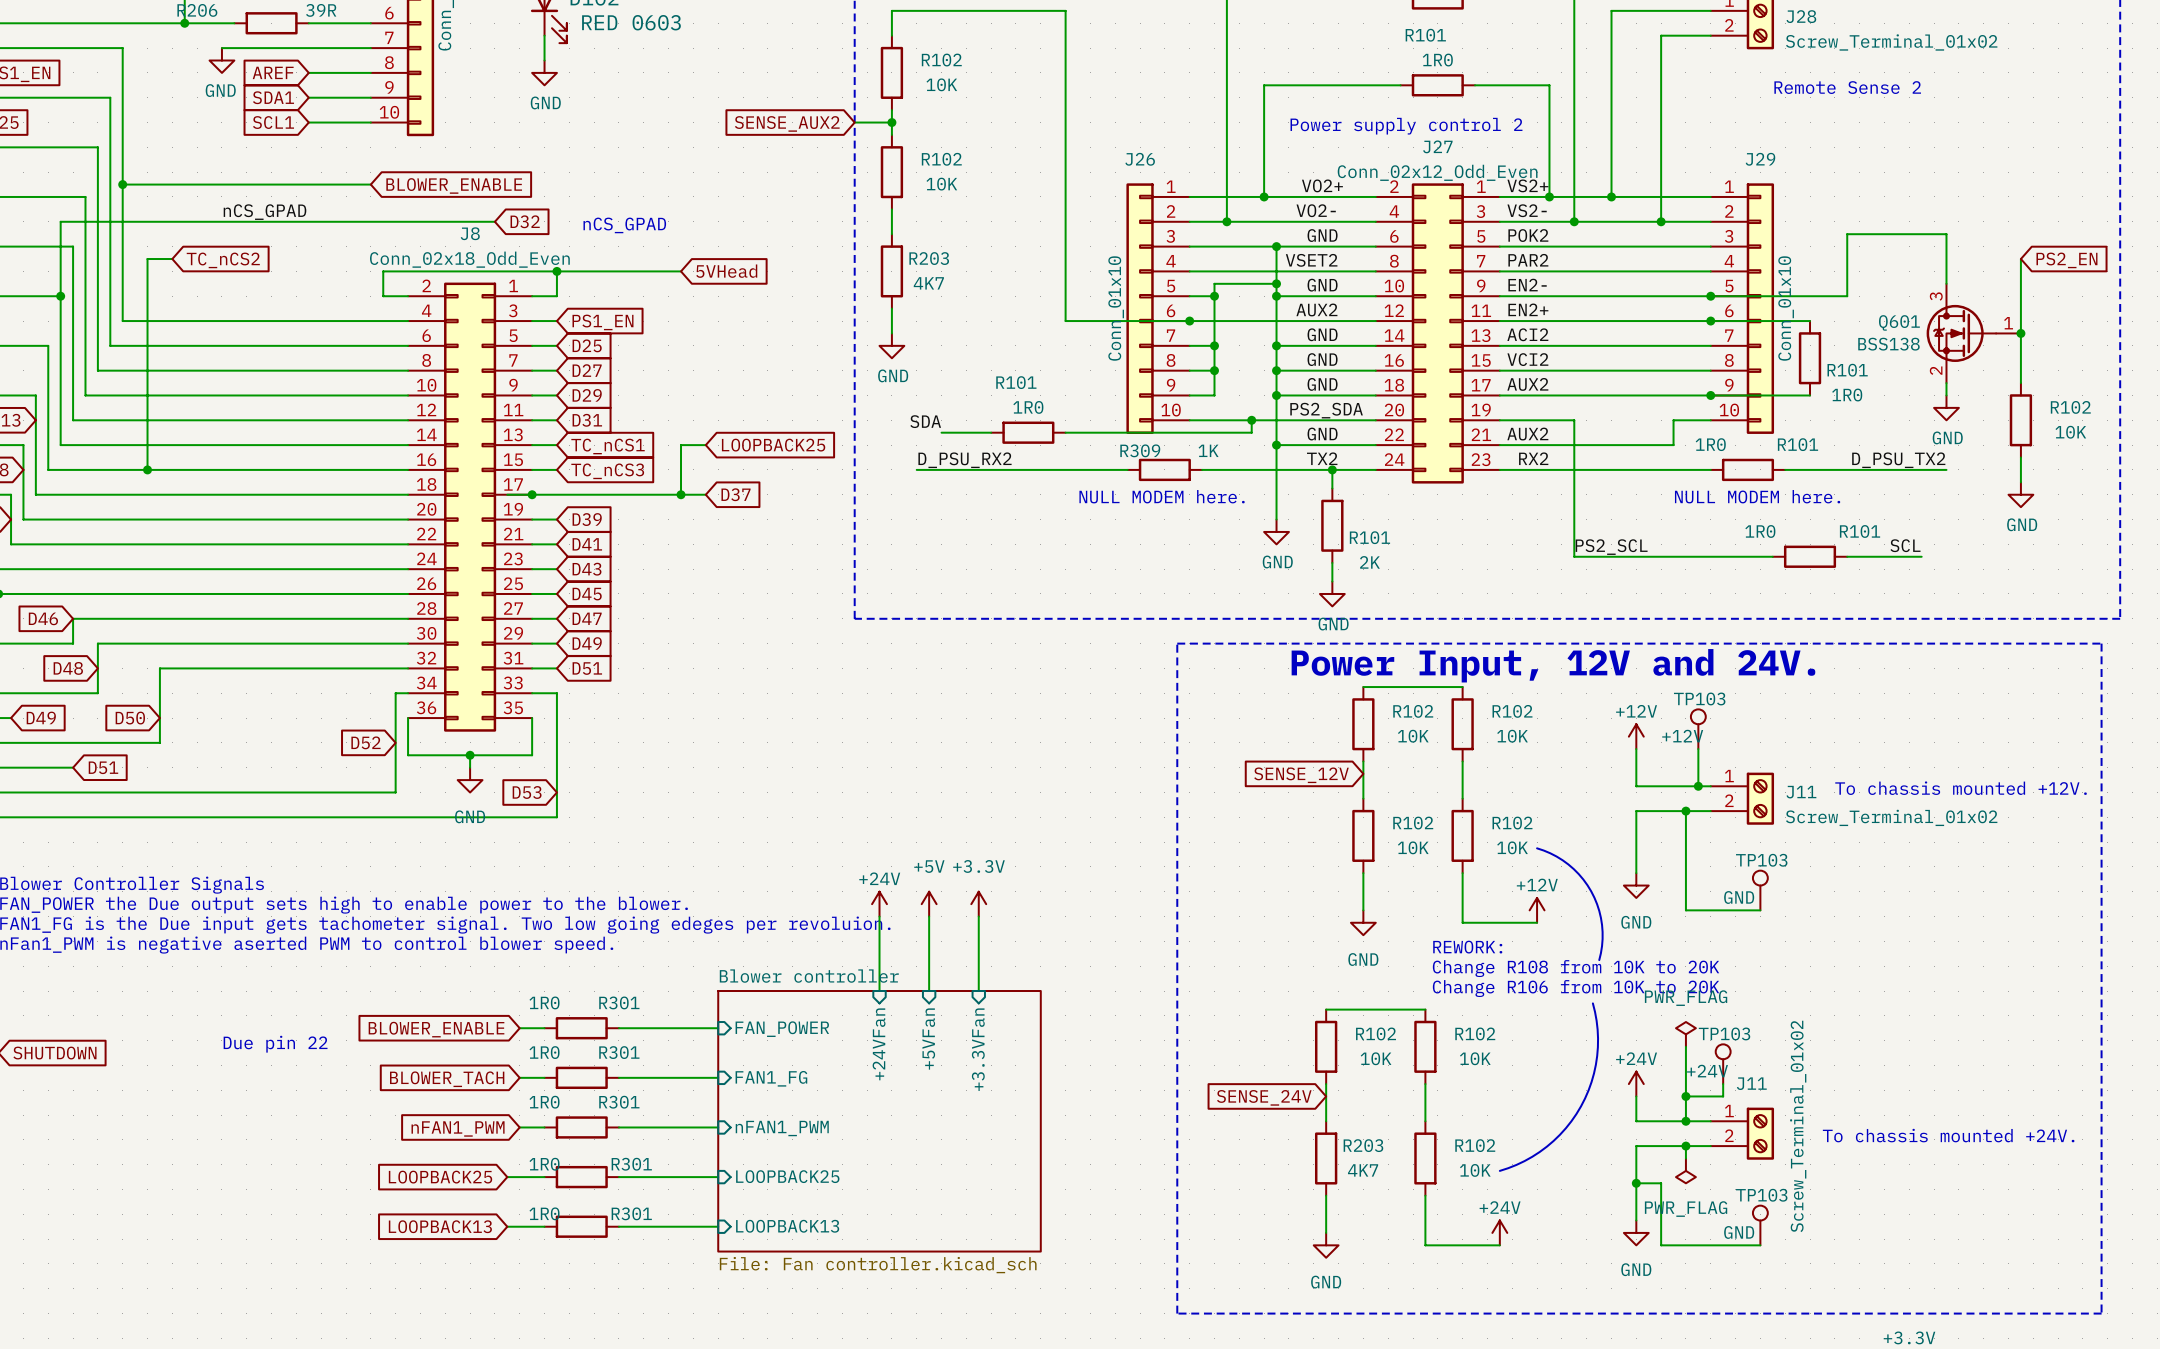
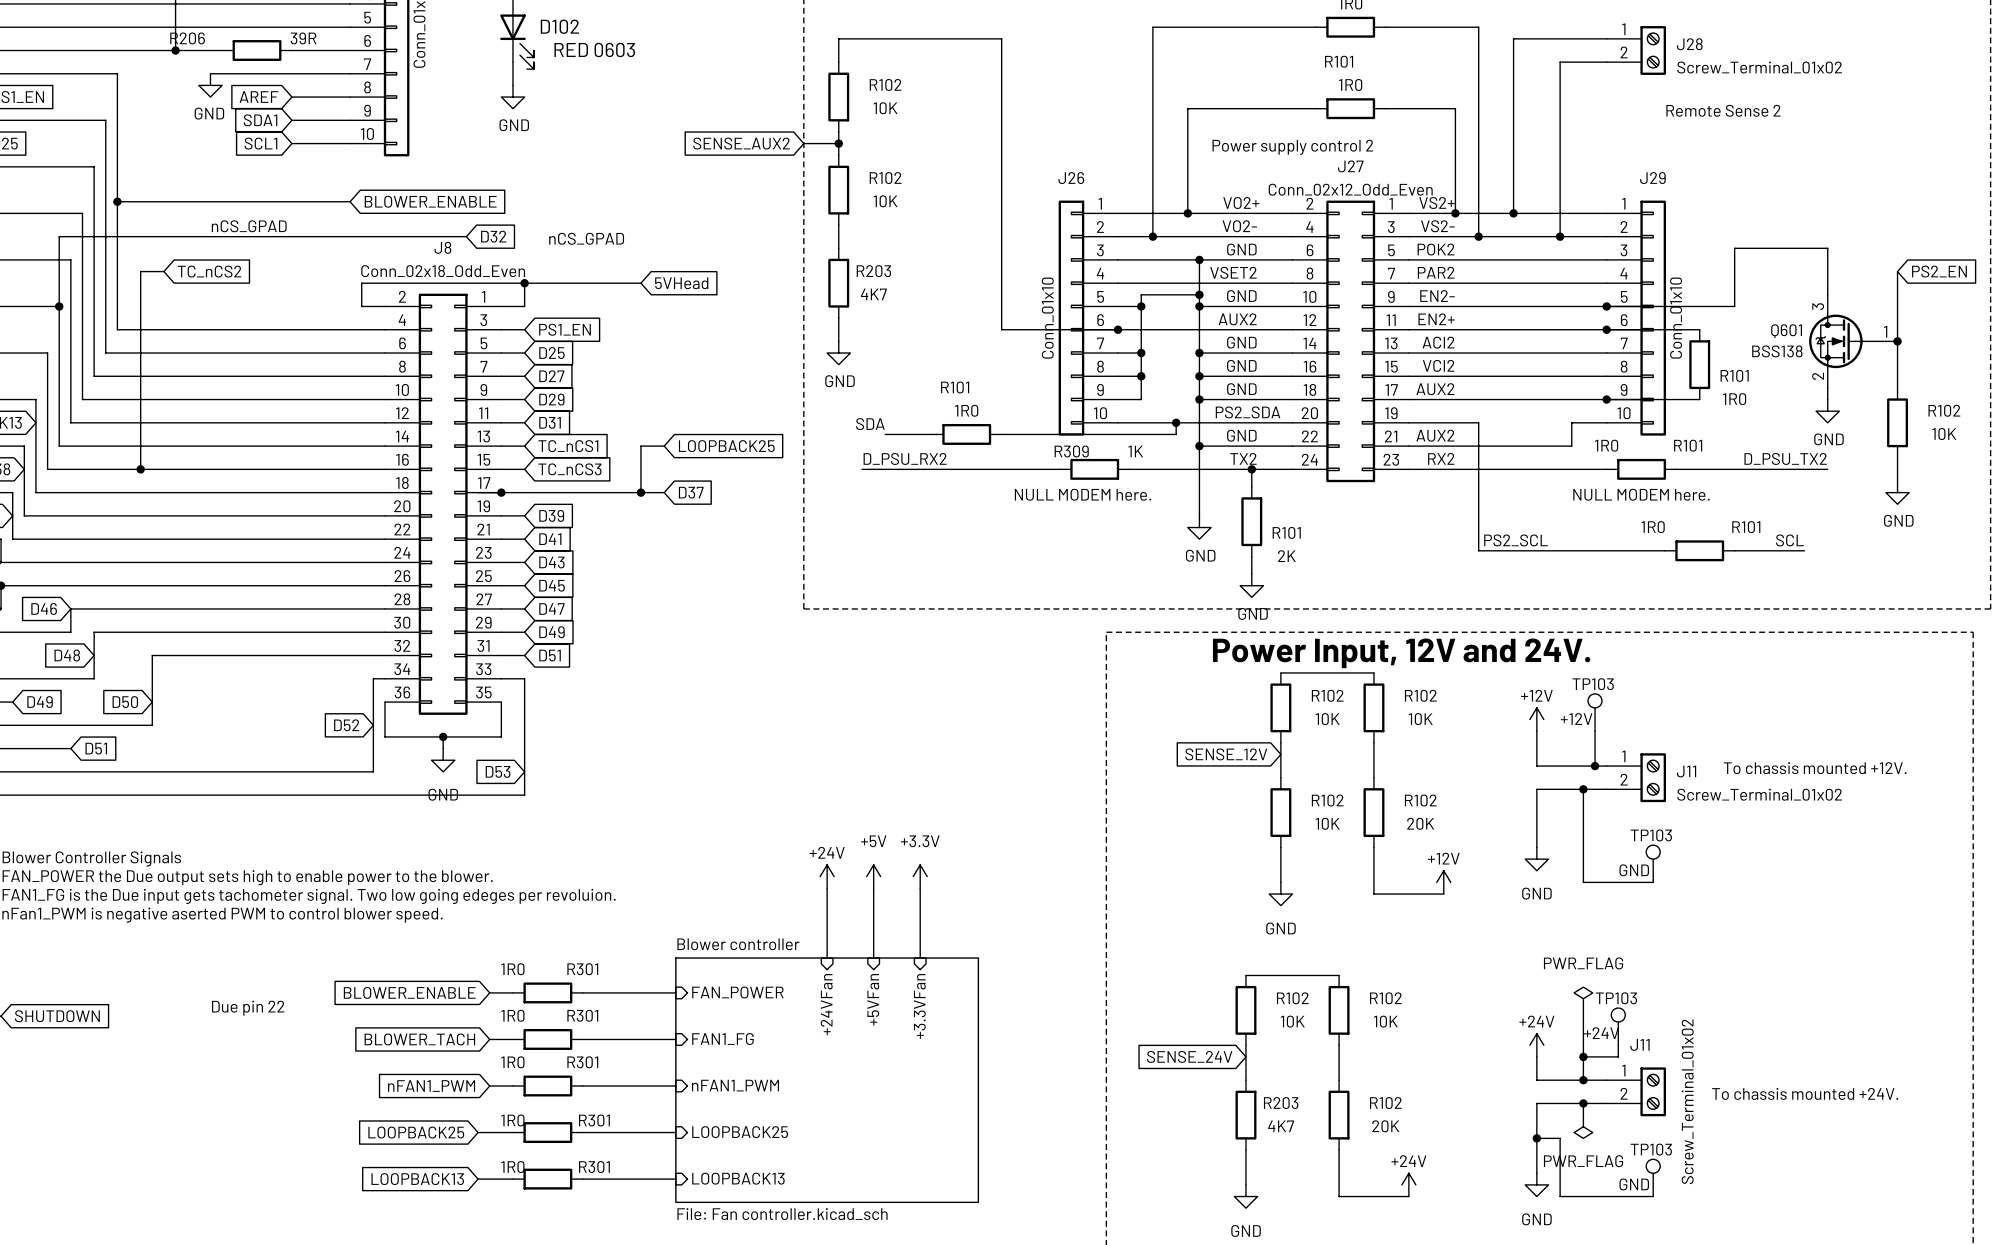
R102 value: 10K (1512, 847) -> 20K (1420, 823)
line: (1537, 848) (1550, 853) (1568, 864) (1578, 874) (1591, 891) (1597, 904) (1602, 924) (1602, 939) (1599, 960) -> none
text: REWORK: (1467, 947) -> none
text: Change R108 from 10K to 20K (1576, 968) -> none
text: Change R106 from 10K to 20K (1576, 988) -> none
line: (1592, 1003) (1597, 1029) (1597, 1056) (1591, 1082) (1581, 1106) (1565, 1128) (1546, 1146) (1524, 1161) (1499, 1170) -> none
R102 value: 10K (1475, 1170) -> 20K (1385, 1126)

